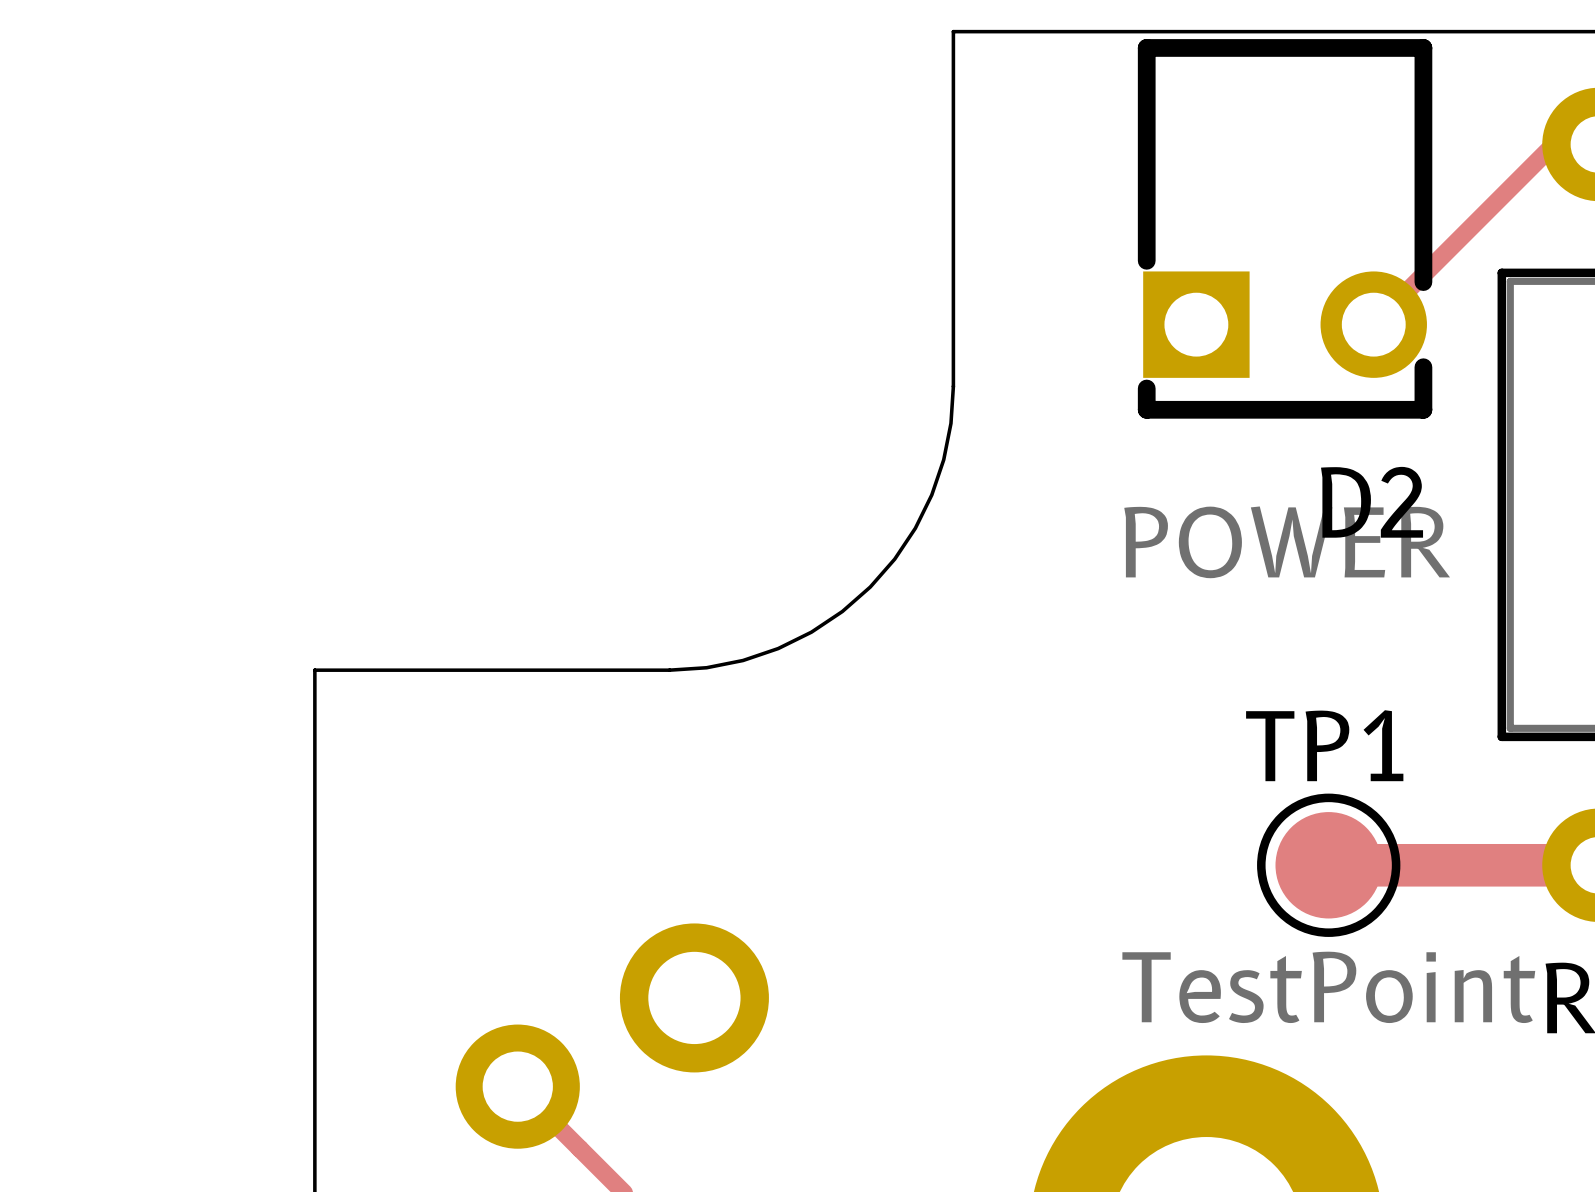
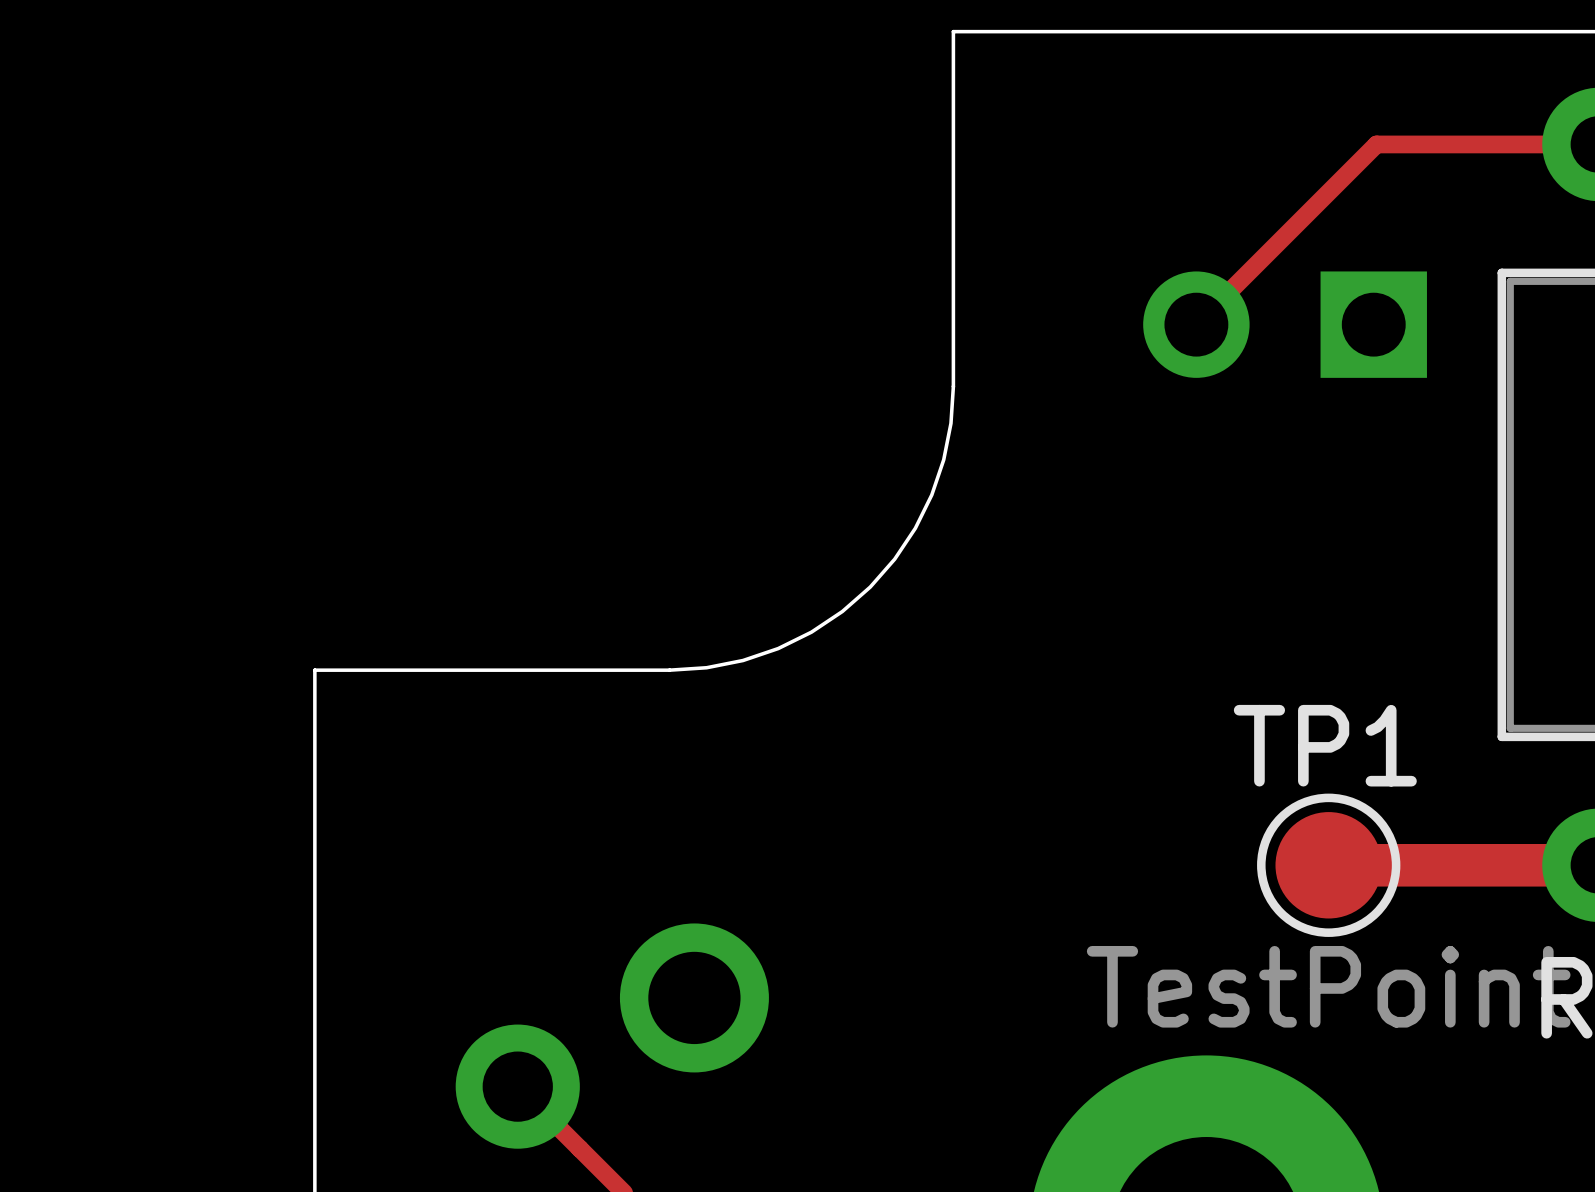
track: (1553, 144) (1373, 324) -> (1553, 144) (1376, 144) (1196, 324)
D2 side: top (1285, 228) -> bottom (1285, 324)

